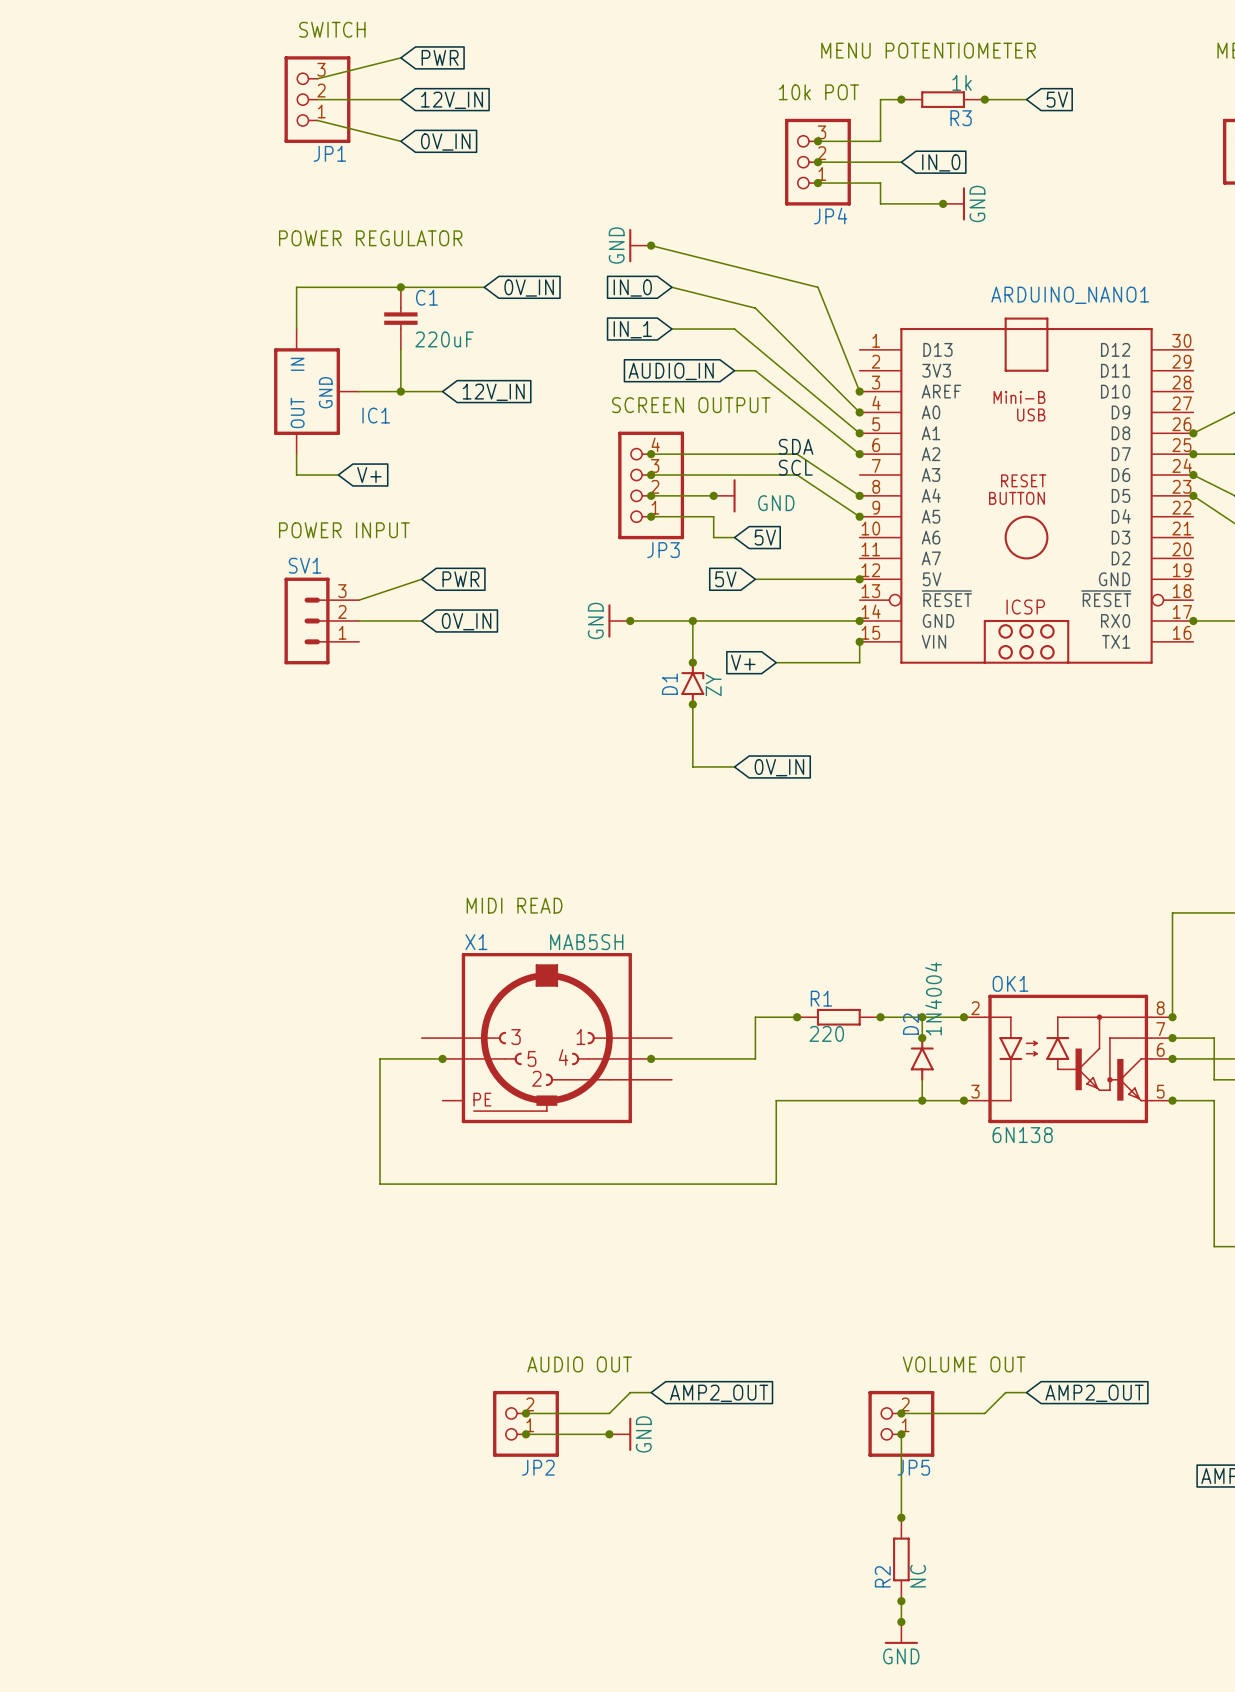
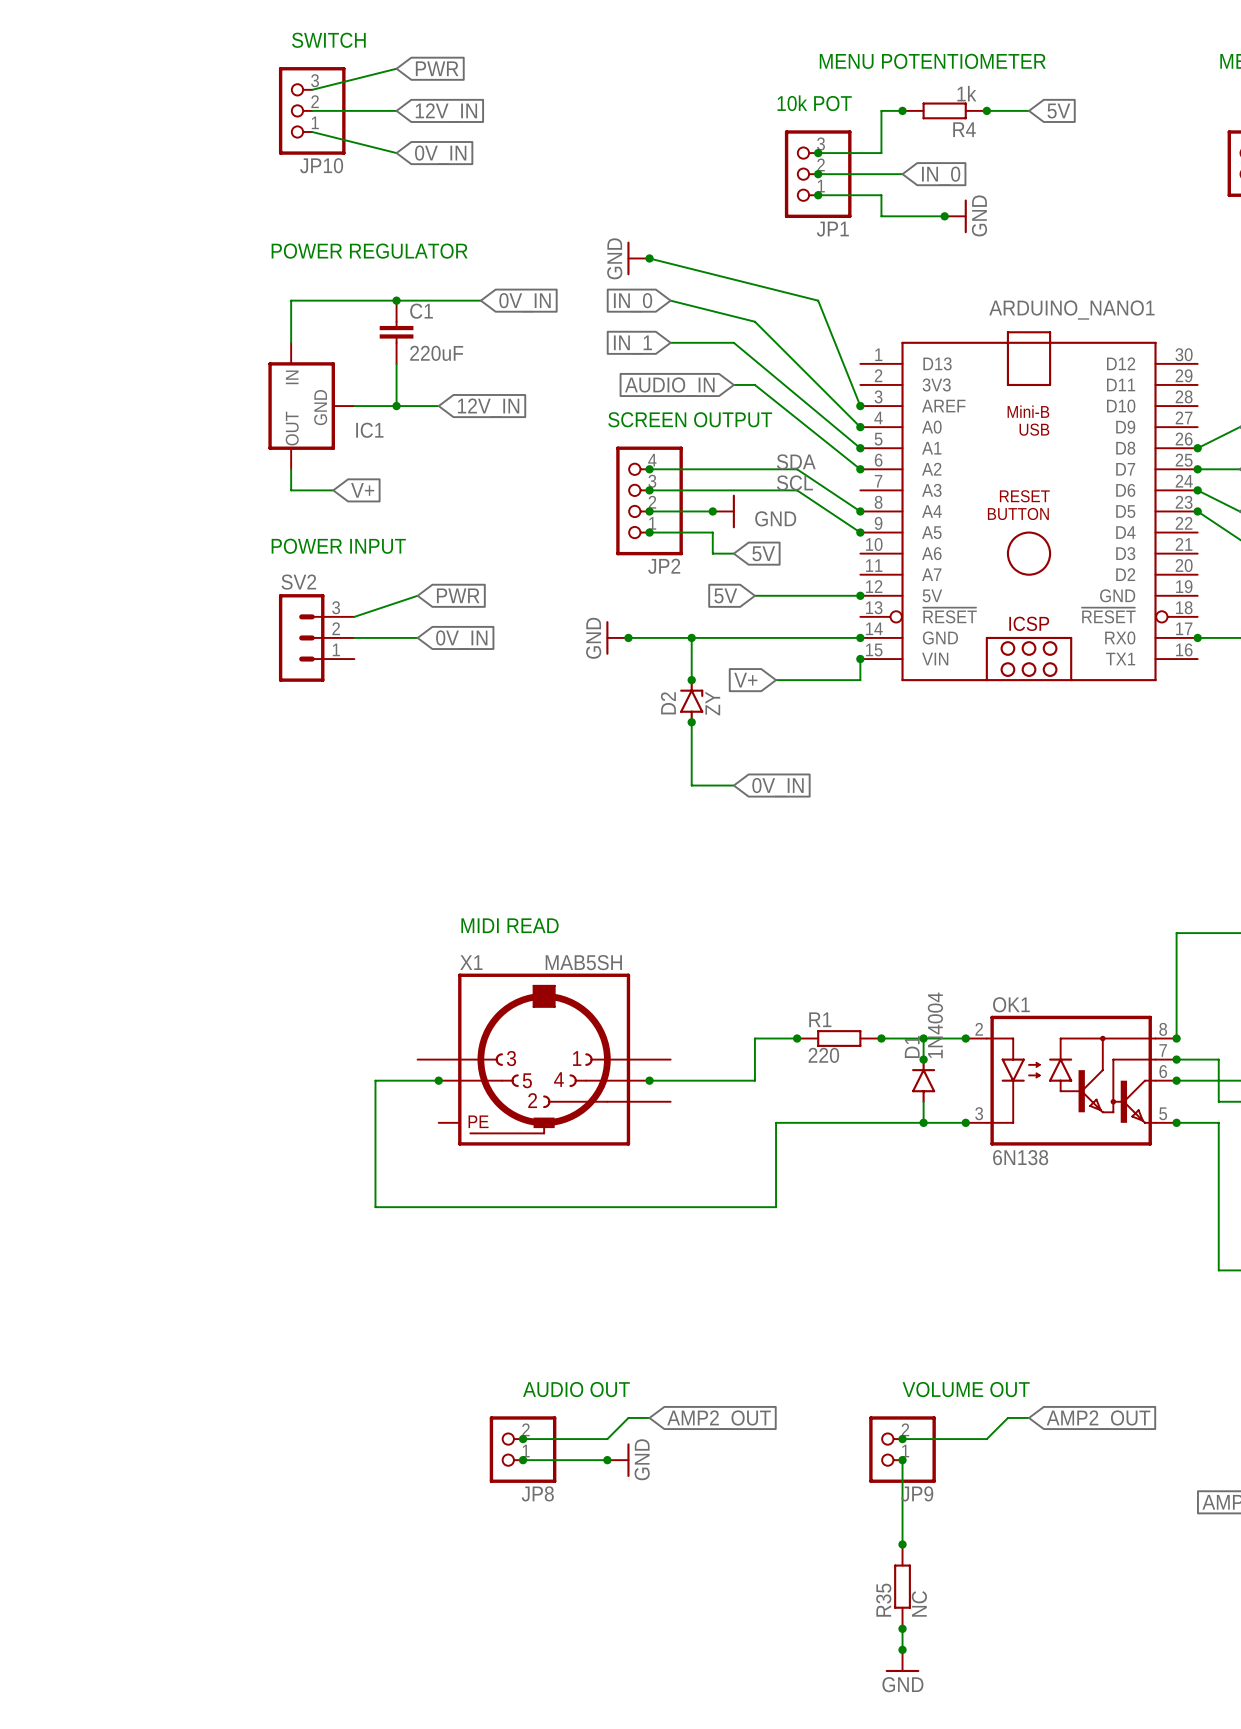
R3 name: R3 (961, 118) -> R4 (964, 129)
JP1 name: JP1 (329, 153) -> JP10 (321, 165)
JP4 name: JP4 (830, 216) -> JP1 (832, 229)
JP3 name: JP3 (663, 550) -> JP2 (664, 566)
SV1 name: SV1 (305, 565) -> SV2 (298, 582)
D1 name: D1 (669, 684) -> D2 (668, 703)
D2 name: D2 (910, 1024) -> D1 (912, 1046)
JP2 name: JP2 (538, 1467) -> JP8 (537, 1493)
JP5 name: JP5 (913, 1467) -> JP9 (917, 1493)
R2 name: R2 (882, 1576) -> R35 (883, 1600)

